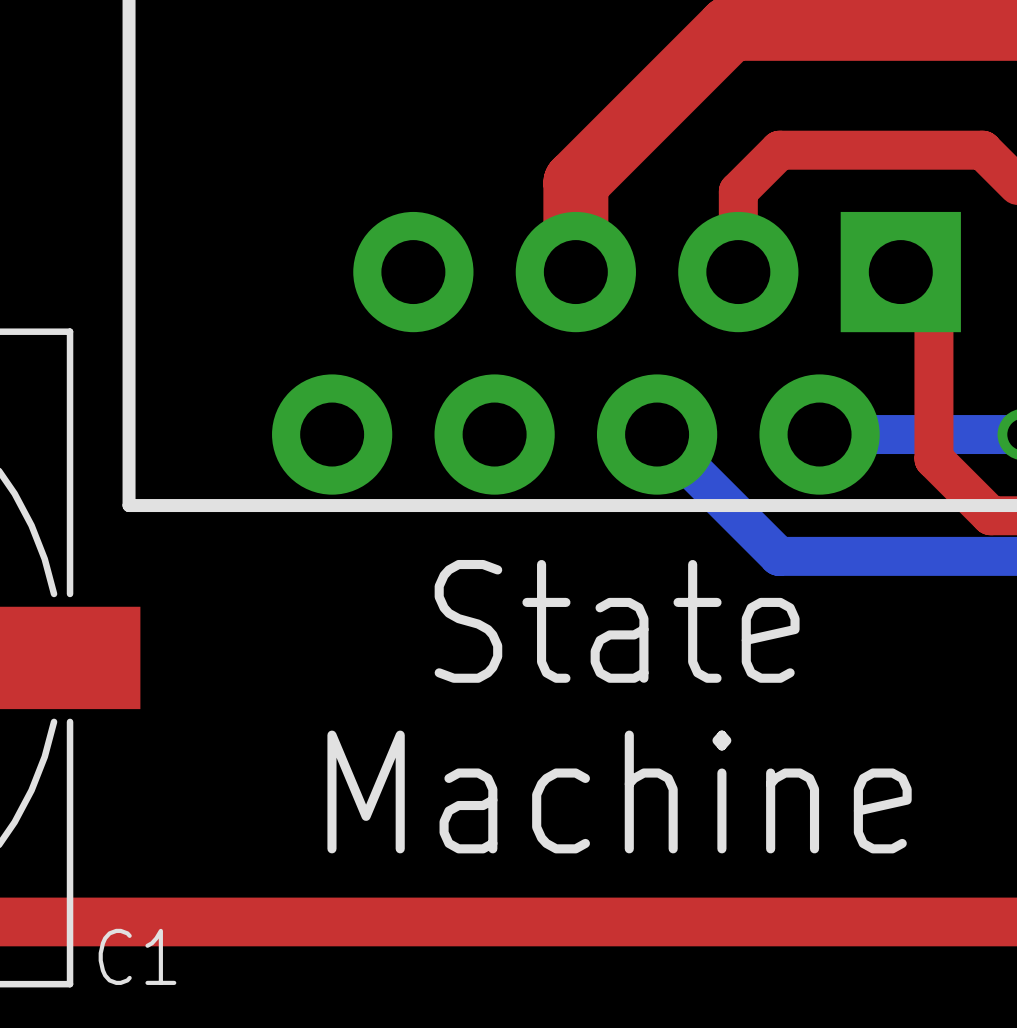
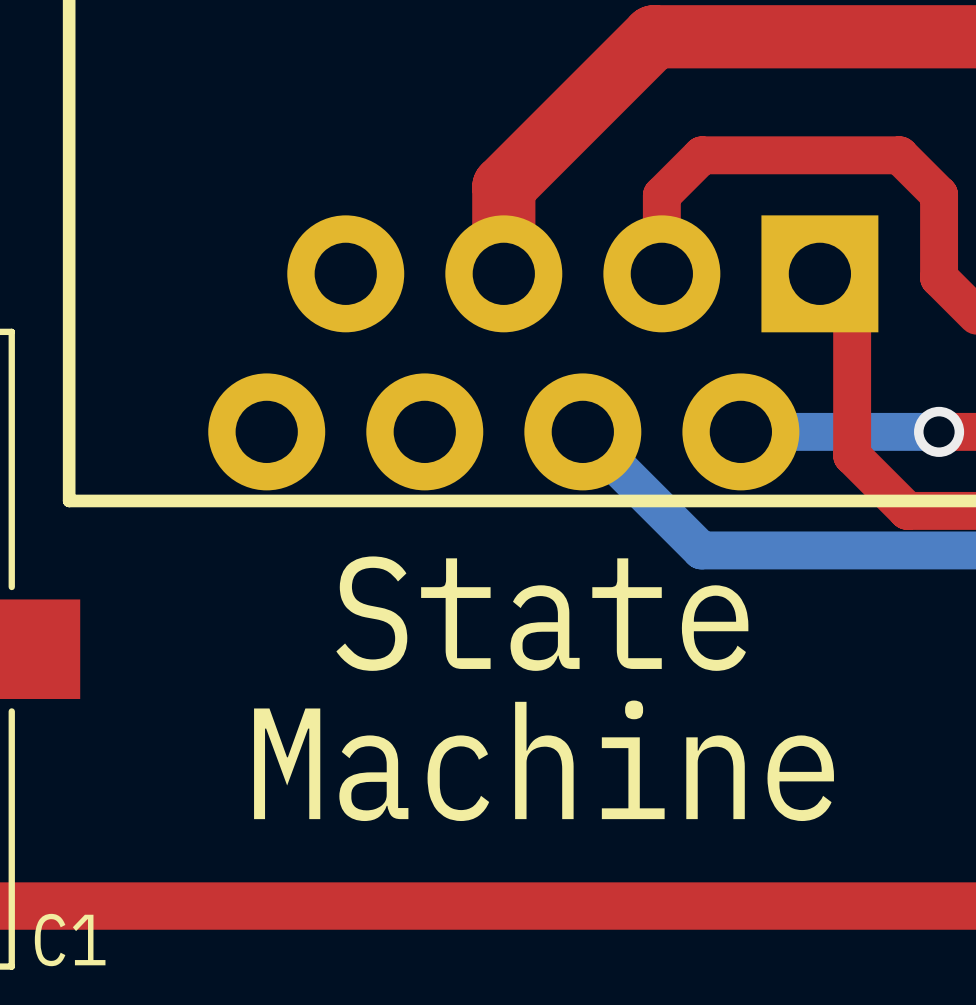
text position: Machine (619, 791) -> Machine (544, 760)

